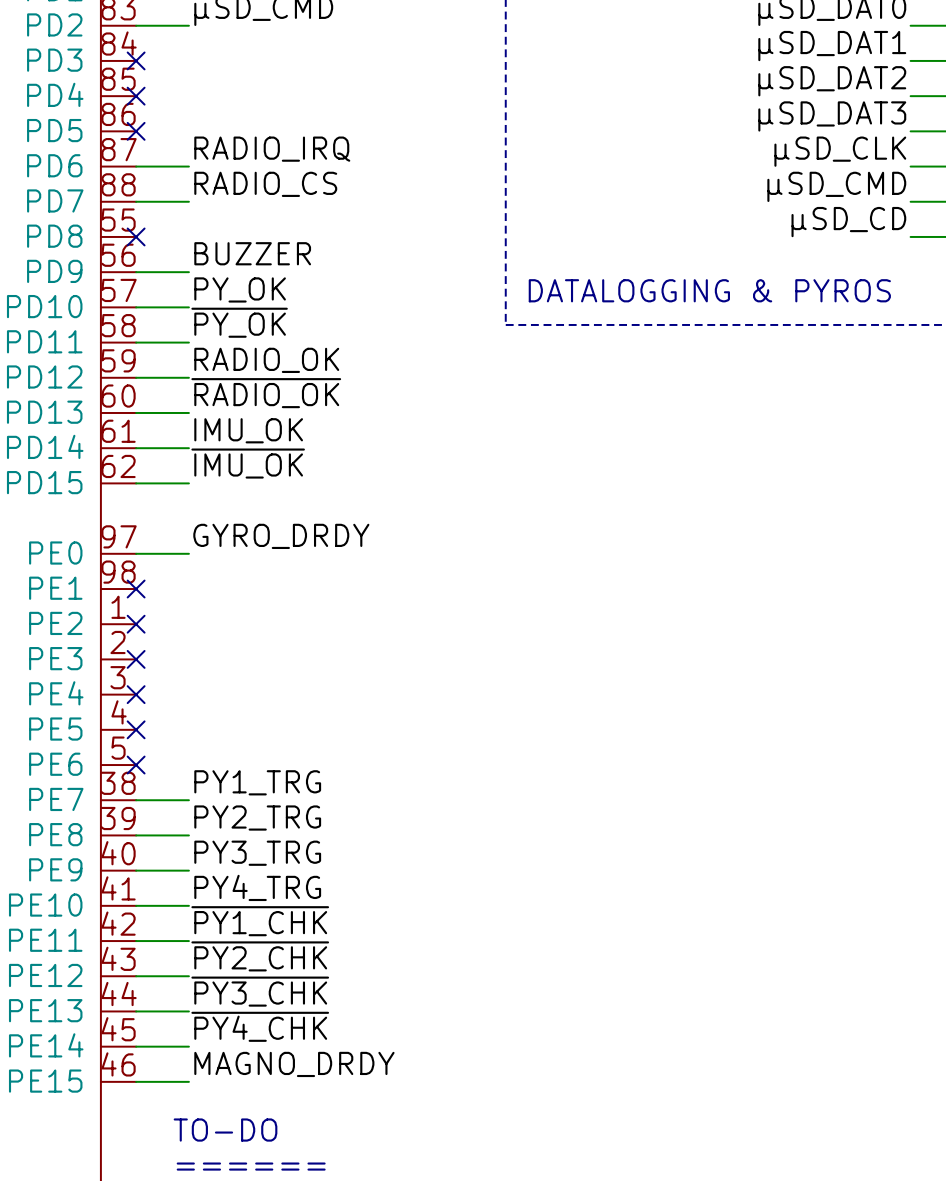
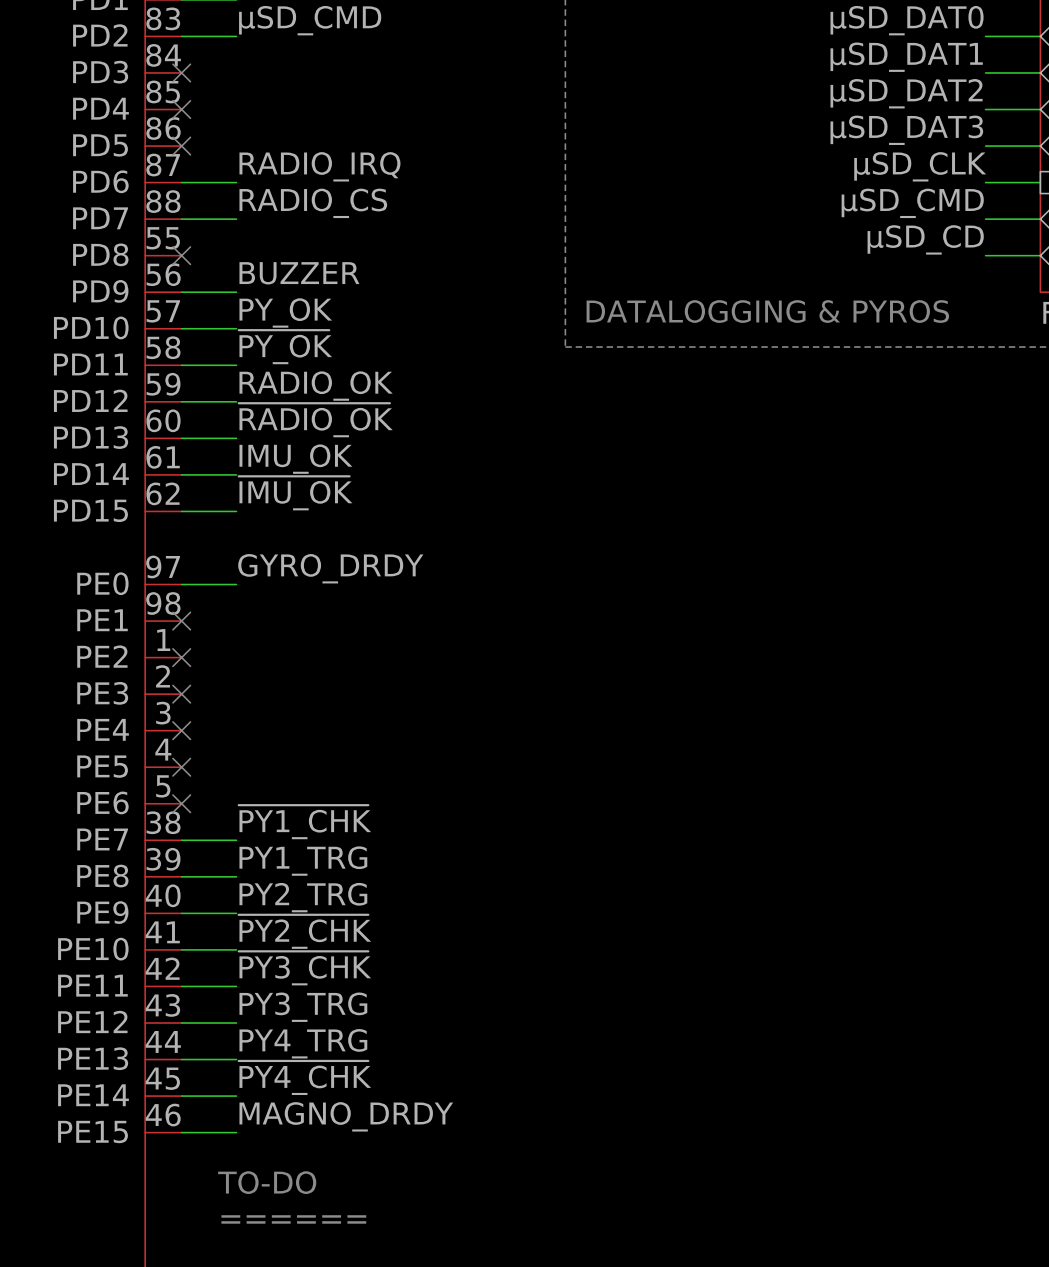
label: PY1_TRG (257, 782) -> ~{PY1_CHK} (304, 822)
label: PY2_TRG (257, 818) -> PY1_TRG (303, 861)
label: PY3_TRG (257, 853) -> PY2_TRG (303, 897)
label: PY4_TRG (257, 887) -> ~{PY2_CHK} (304, 931)
label: ~{PY1_CHK} (260, 921) -> ~{PY3_CHK} (304, 968)
label: ~{PY2_CHK} (260, 956) -> PY3_TRG (303, 1007)
label: ~{PY3_CHK} (260, 991) -> PY4_TRG (303, 1043)

